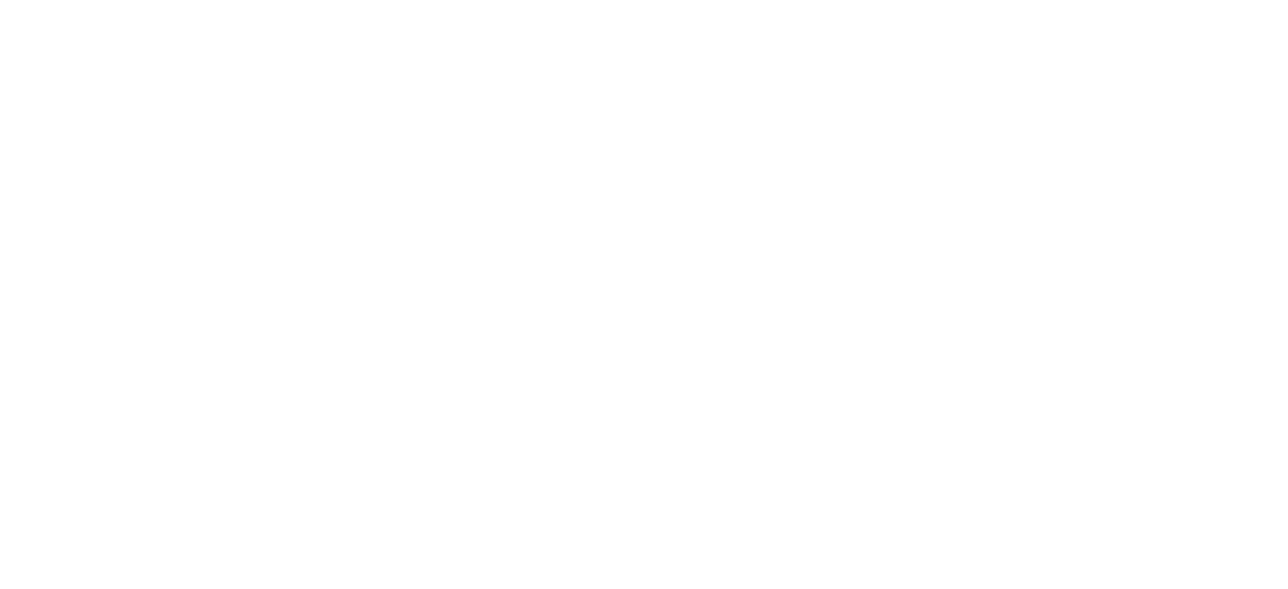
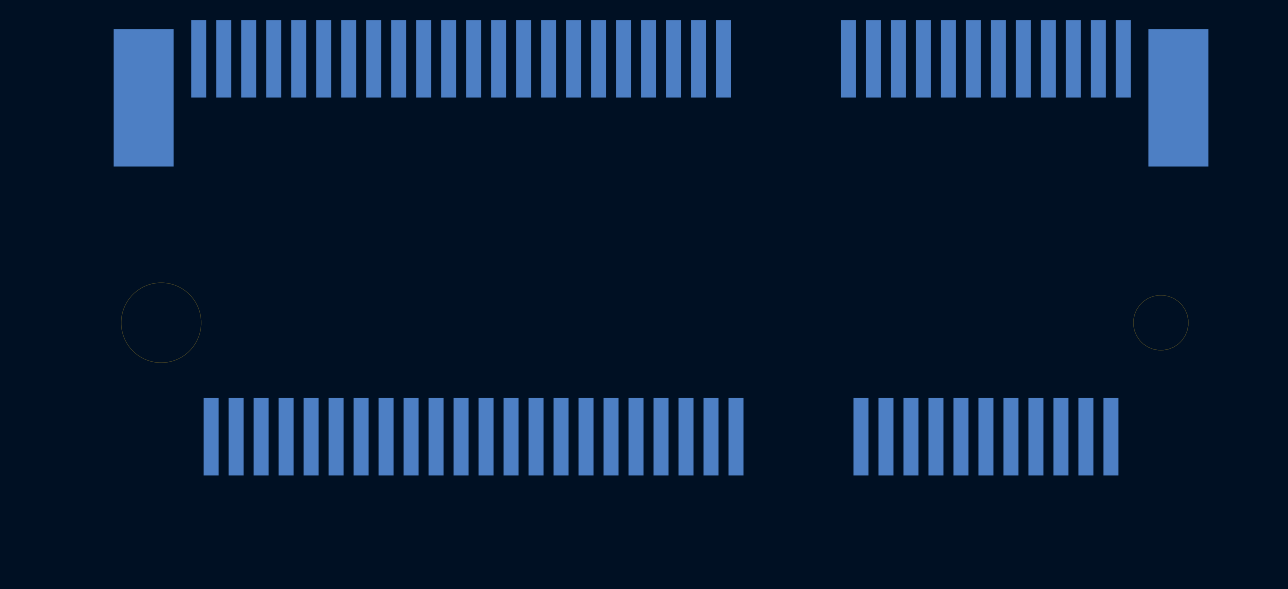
part: none -> (661, 247)

